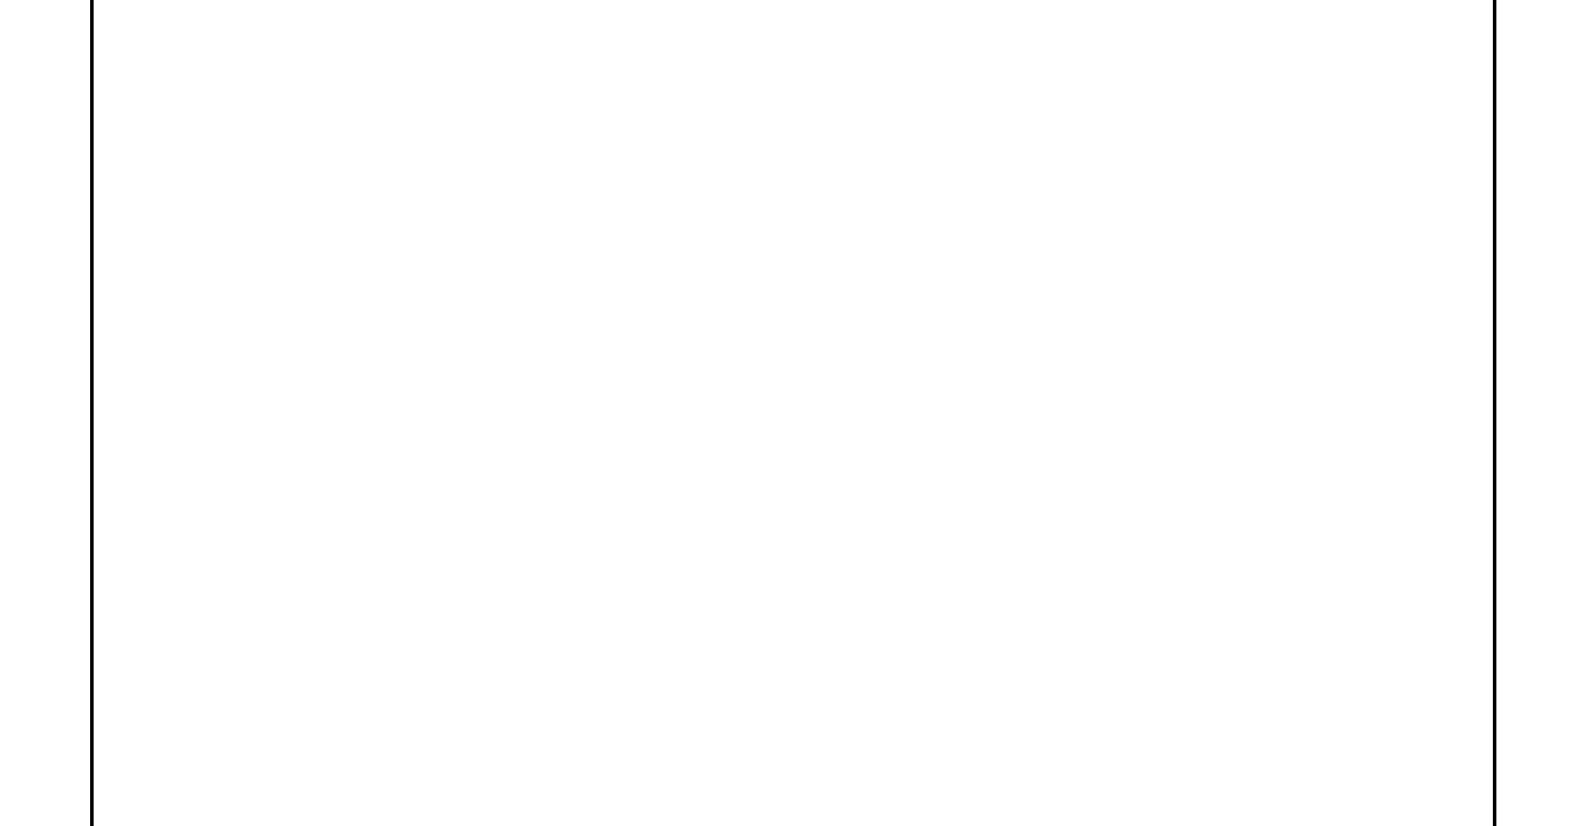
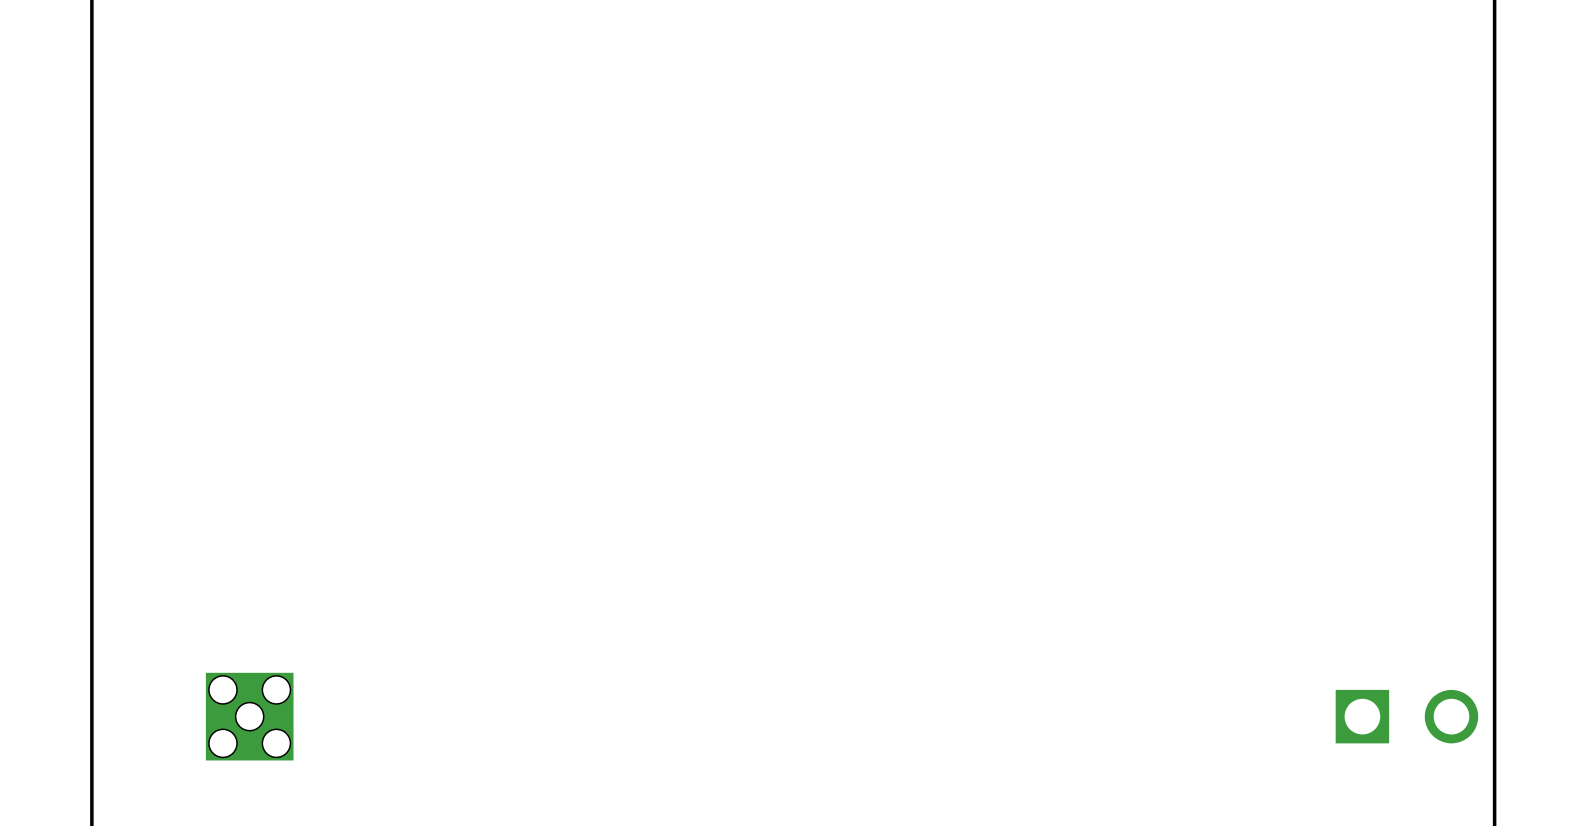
part: none -> (249, 716)
part: none -> (1406, 716)

